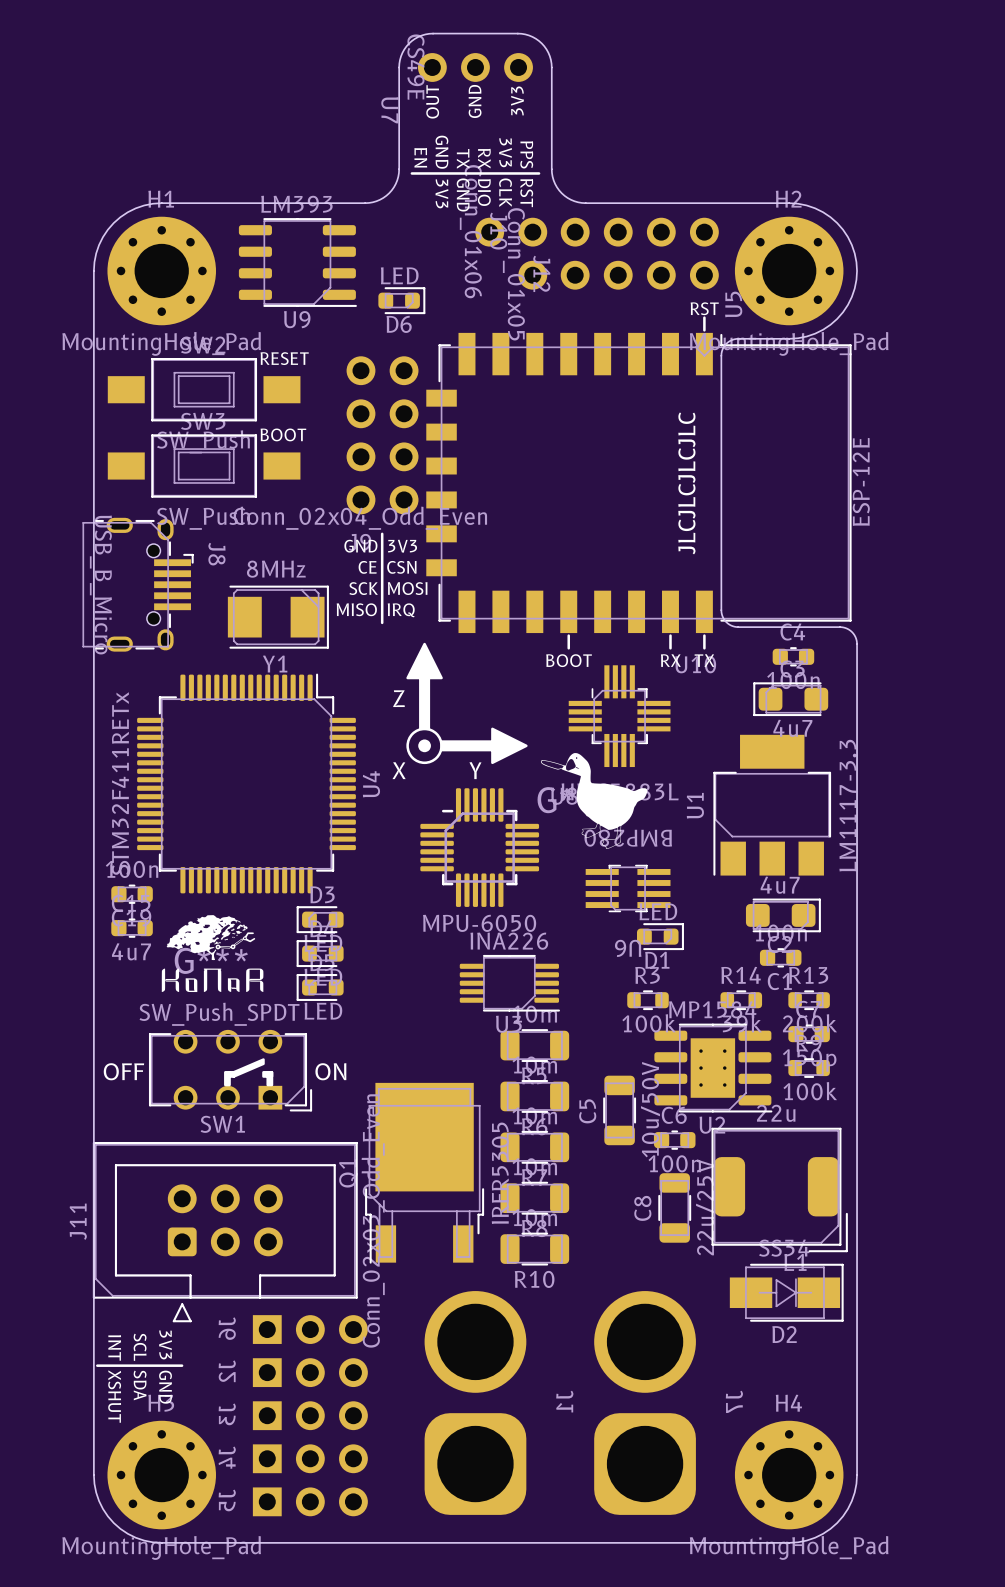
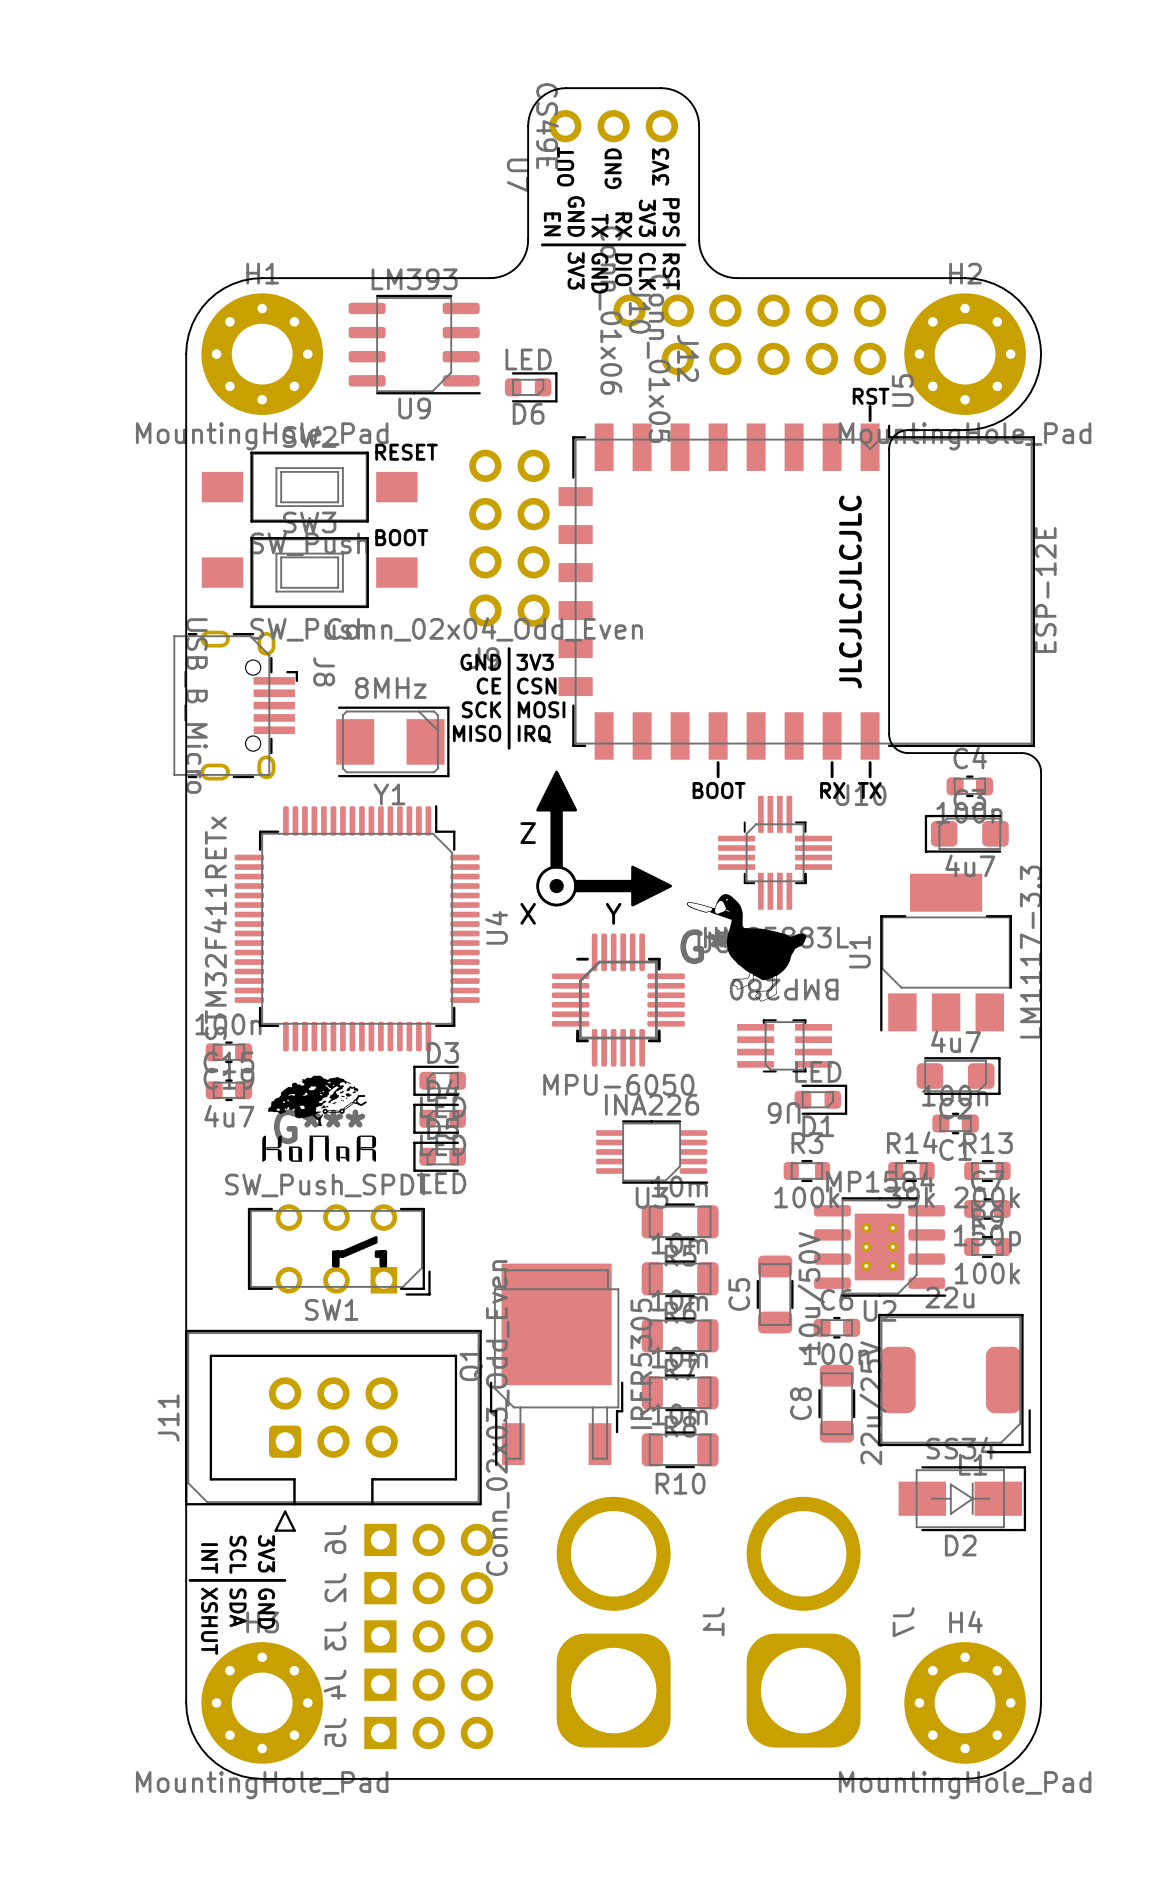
text: OFF (123, 1071) -> none
text: ON (330, 1071) -> none

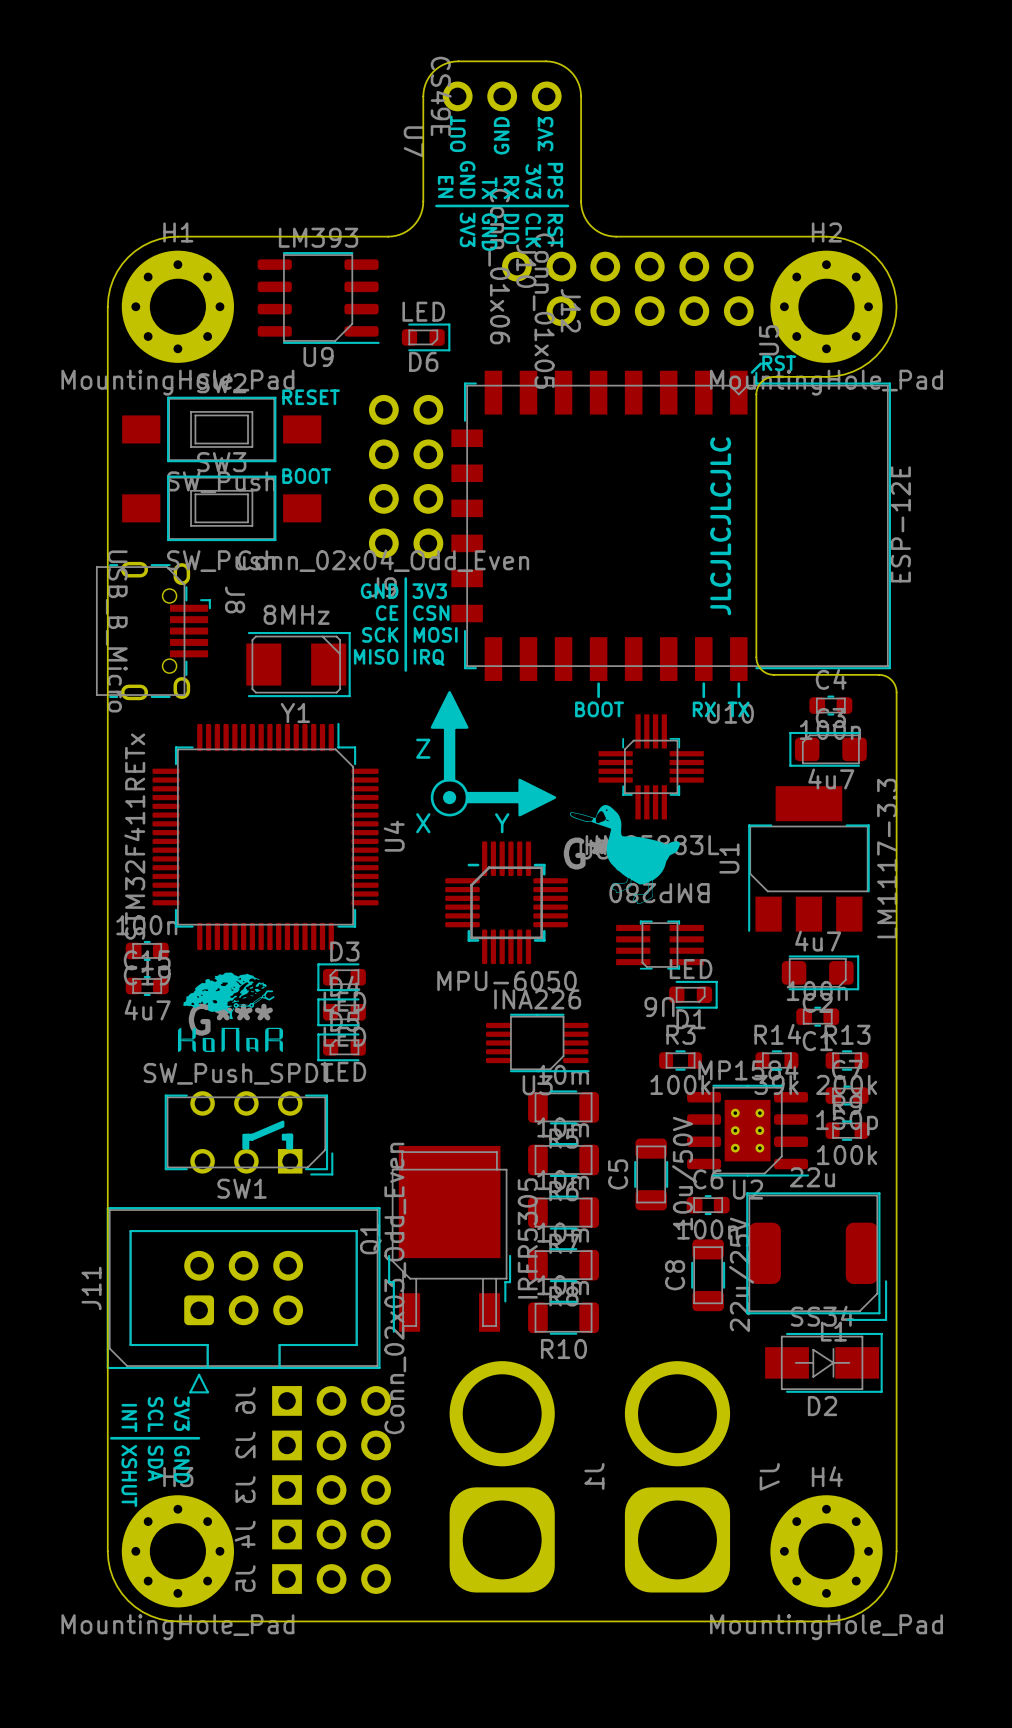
text position: RST (871, 396) -> RST (779, 363)
line: (870, 406) (870, 420) -> none
line: none -> (760, 363) (751, 372)

